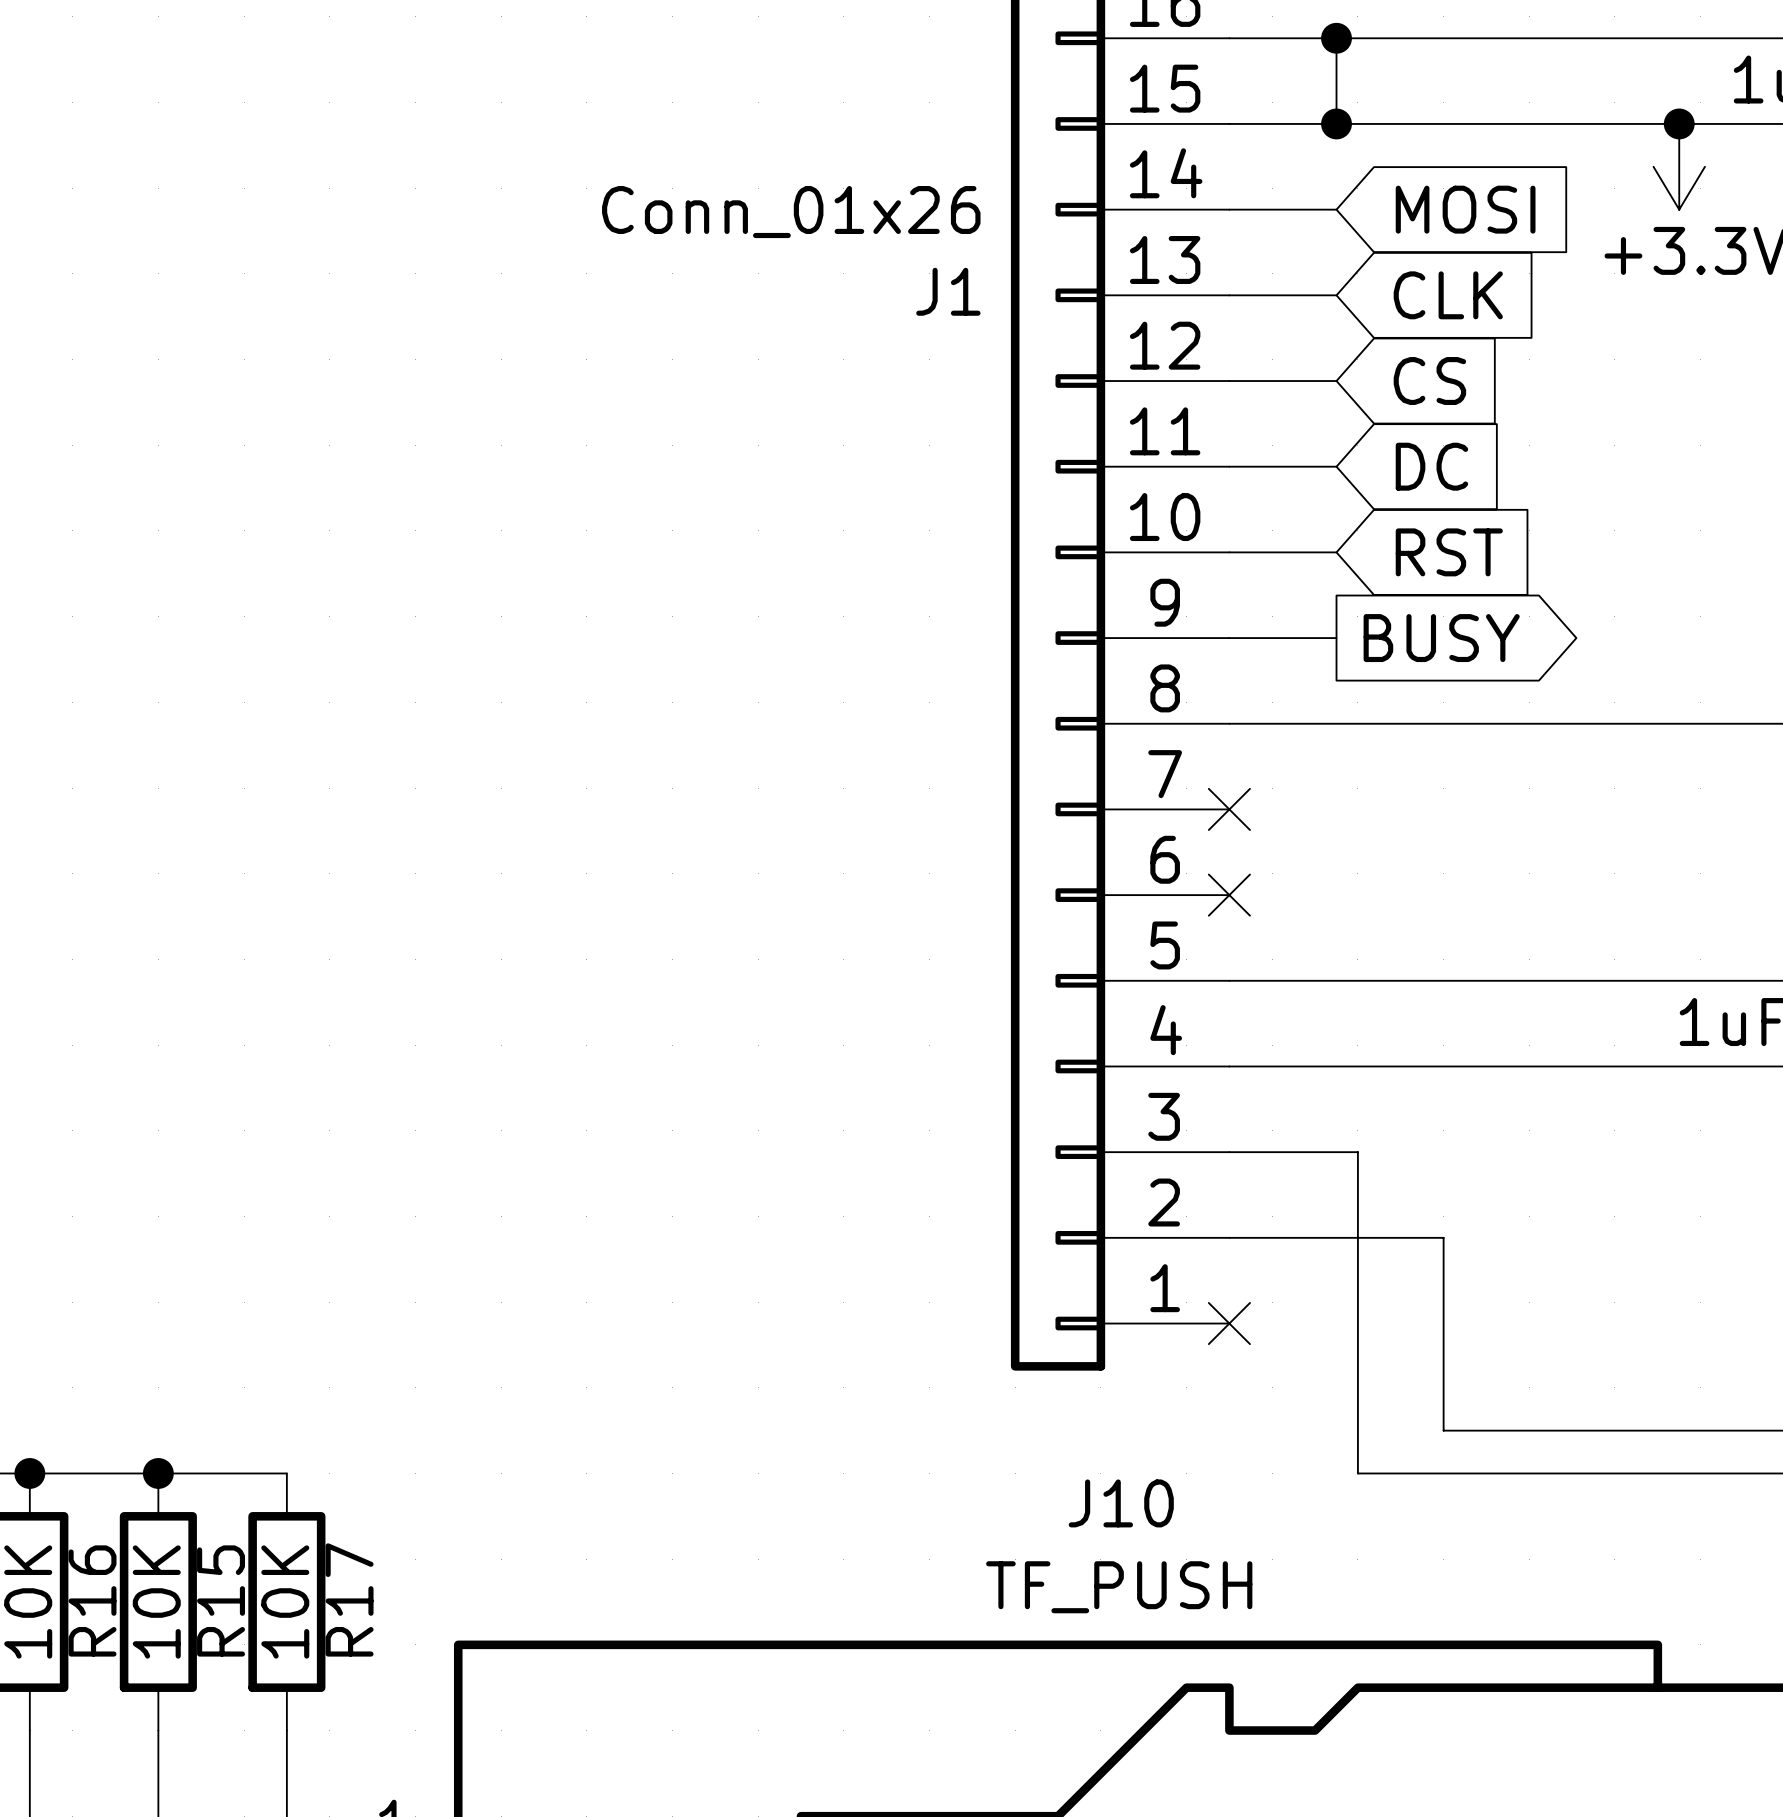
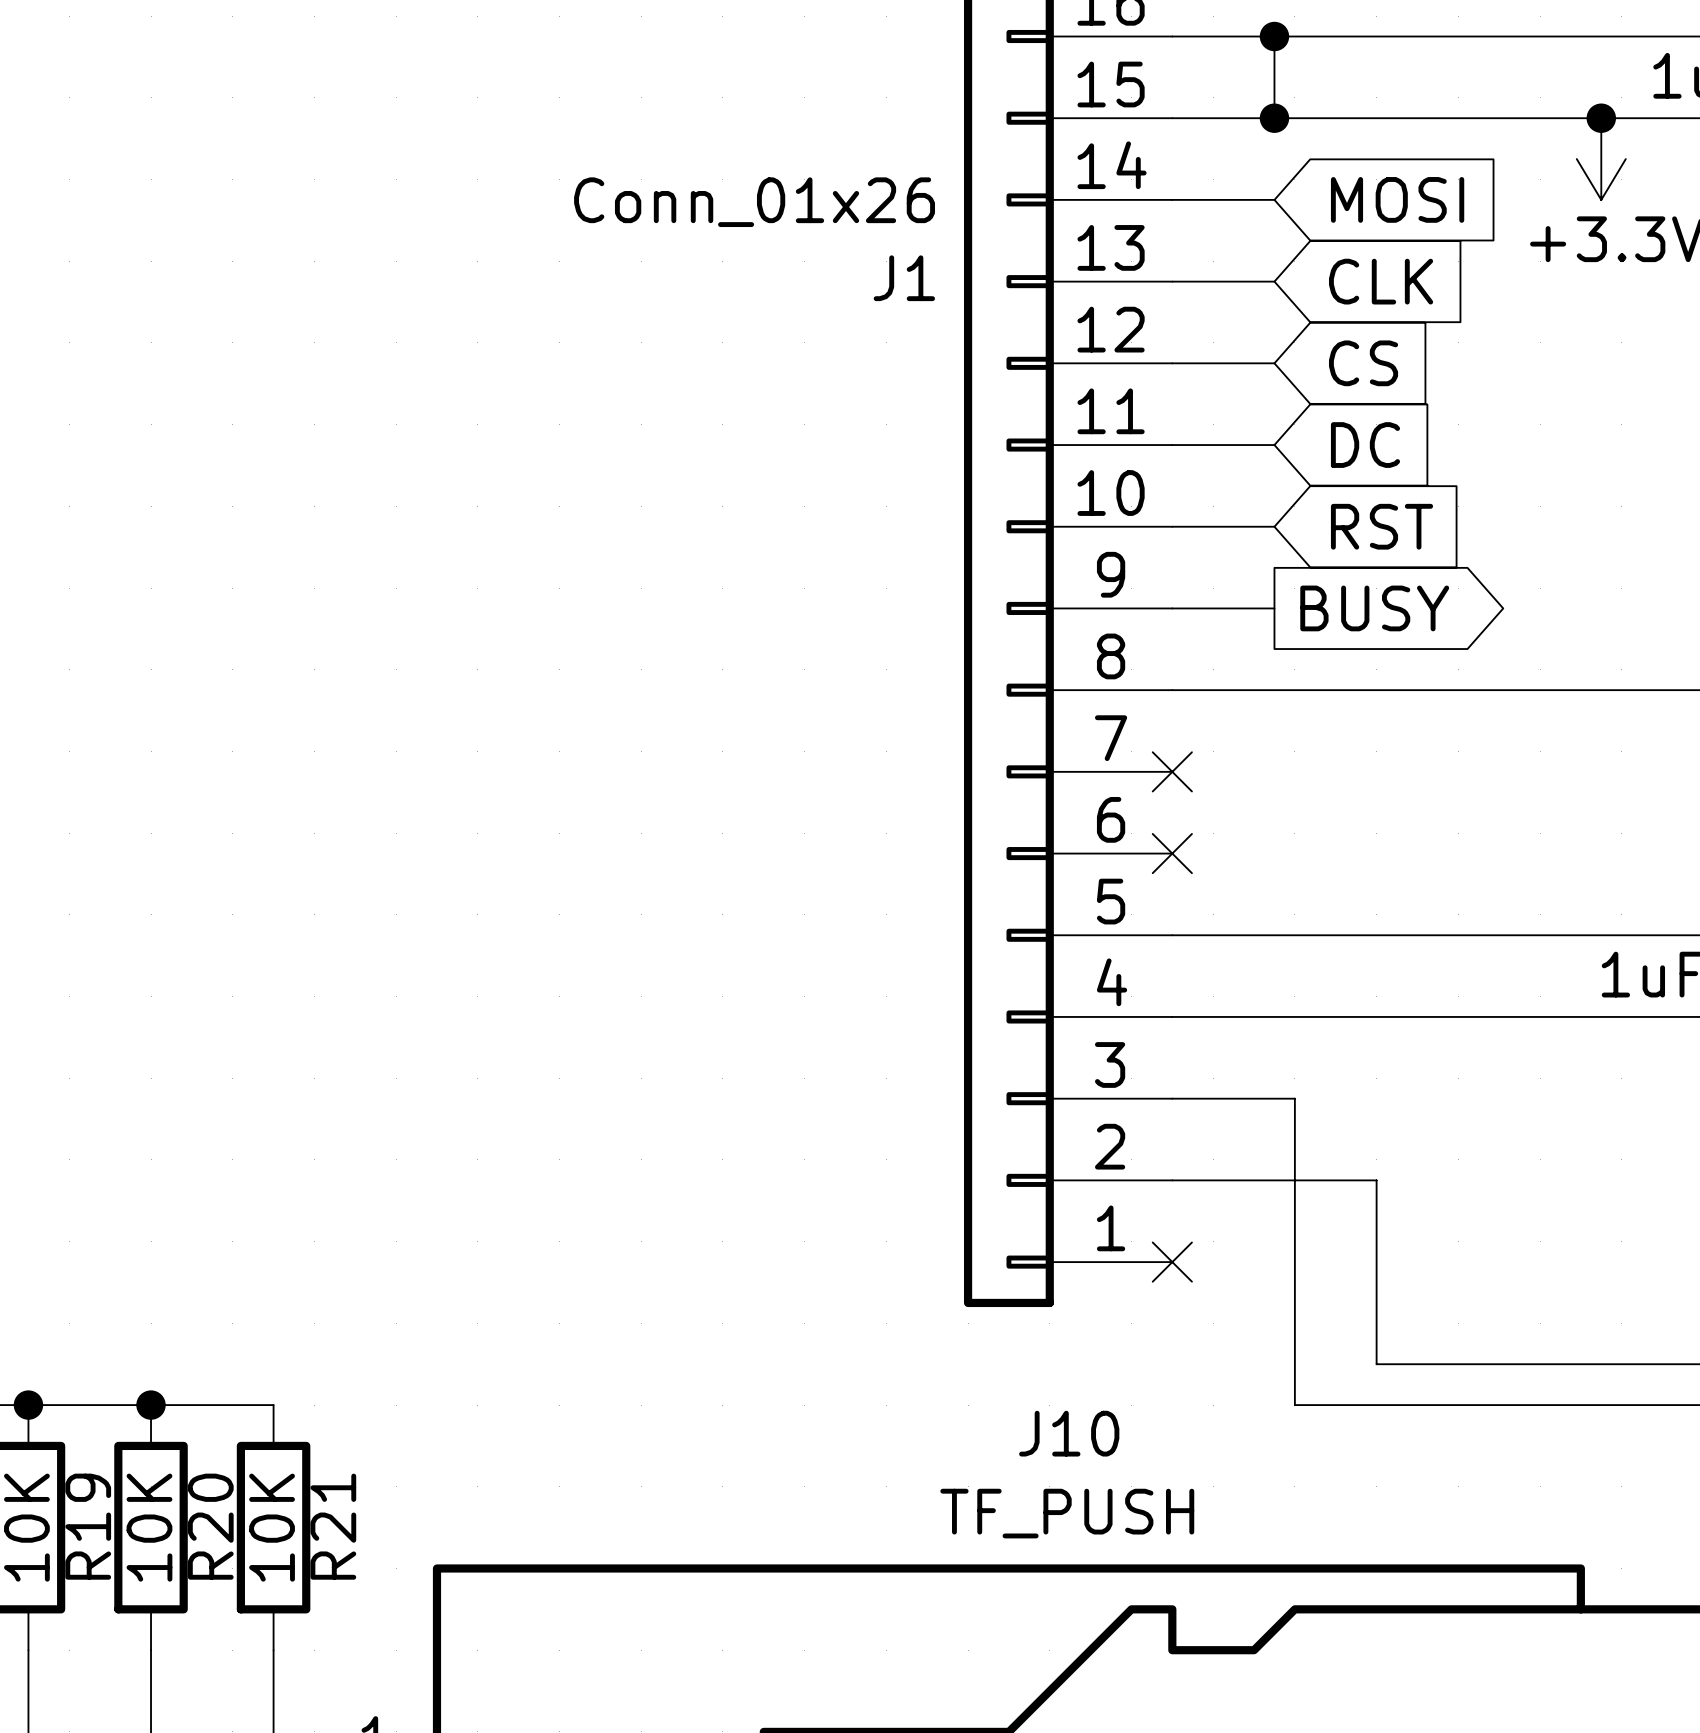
R17 name: R17 (349, 1599) -> R21 (333, 1526)
R16 name: R16 (92, 1600) -> R19 (88, 1526)
R15 name: R15 (221, 1600) -> R20 (210, 1526)

